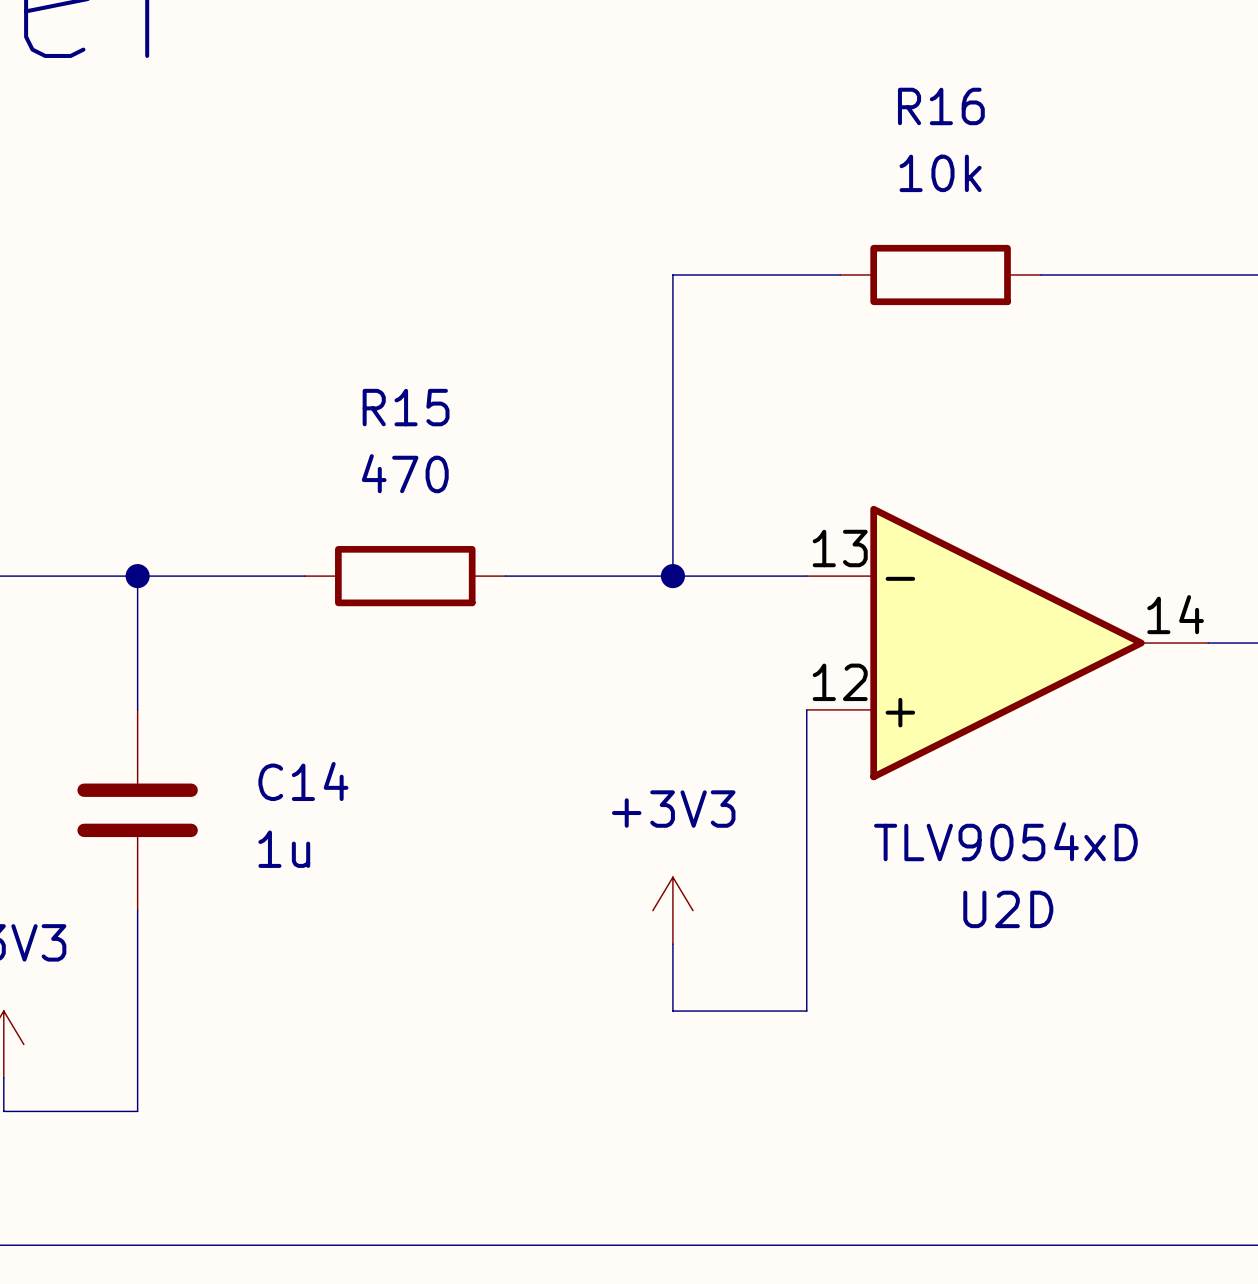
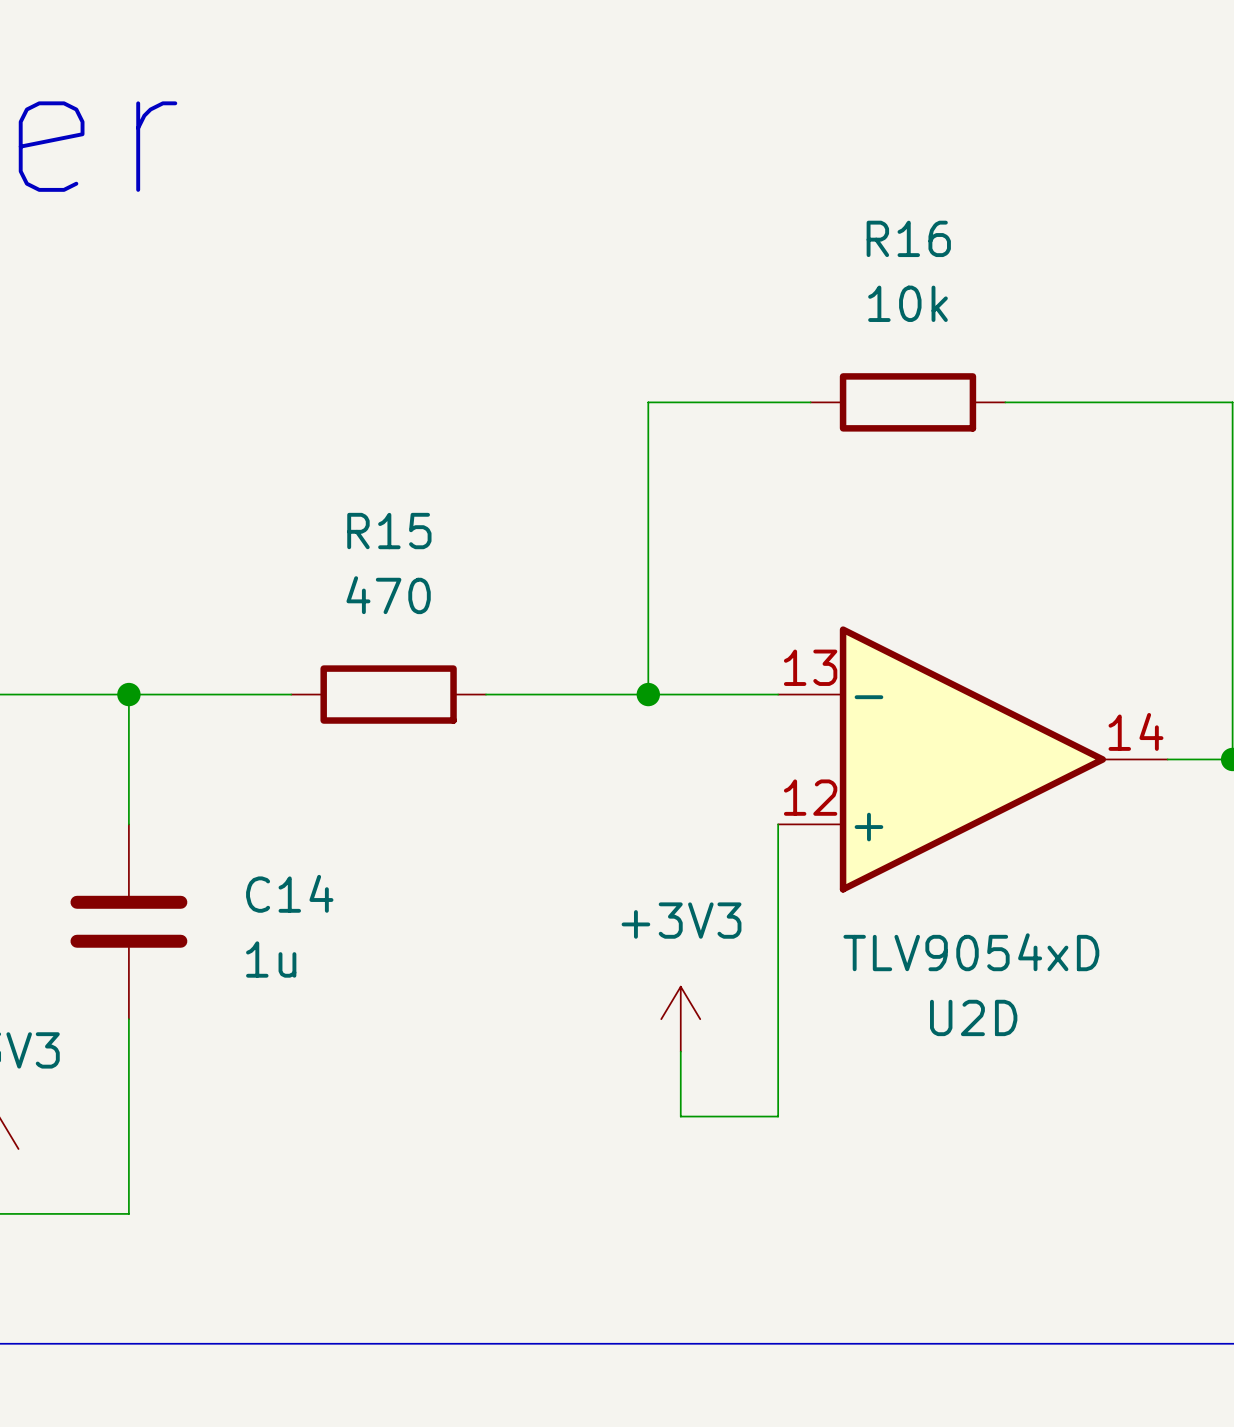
power symbol position: +3V3 (672, 910) -> +3V3 (680, 1019)
wire: (672, 944) (672, 1011) (706, 1011) -> (680, 1051) (680, 1116)

